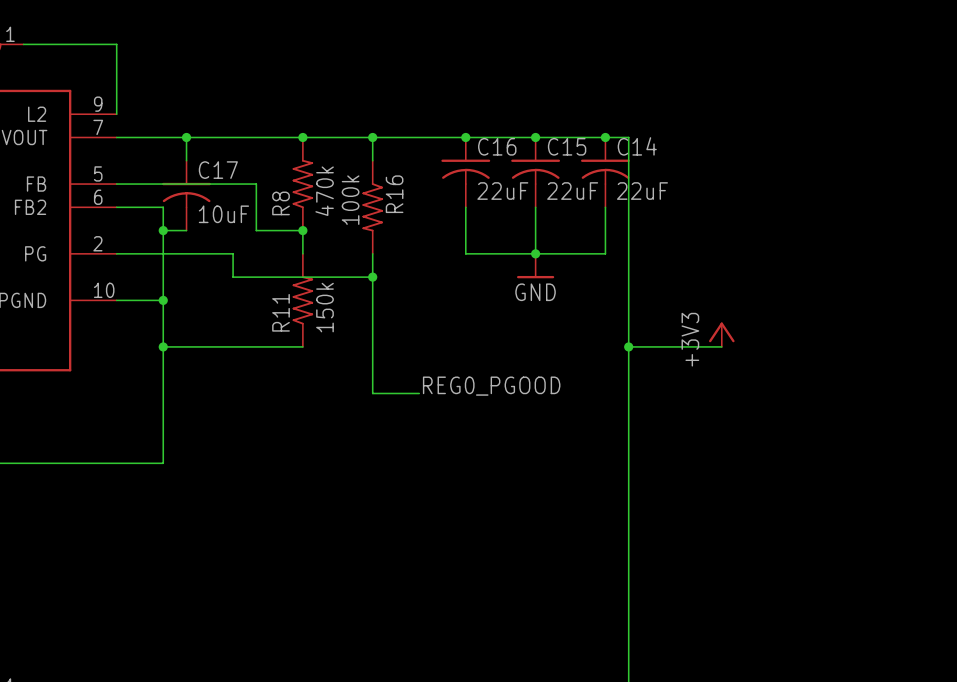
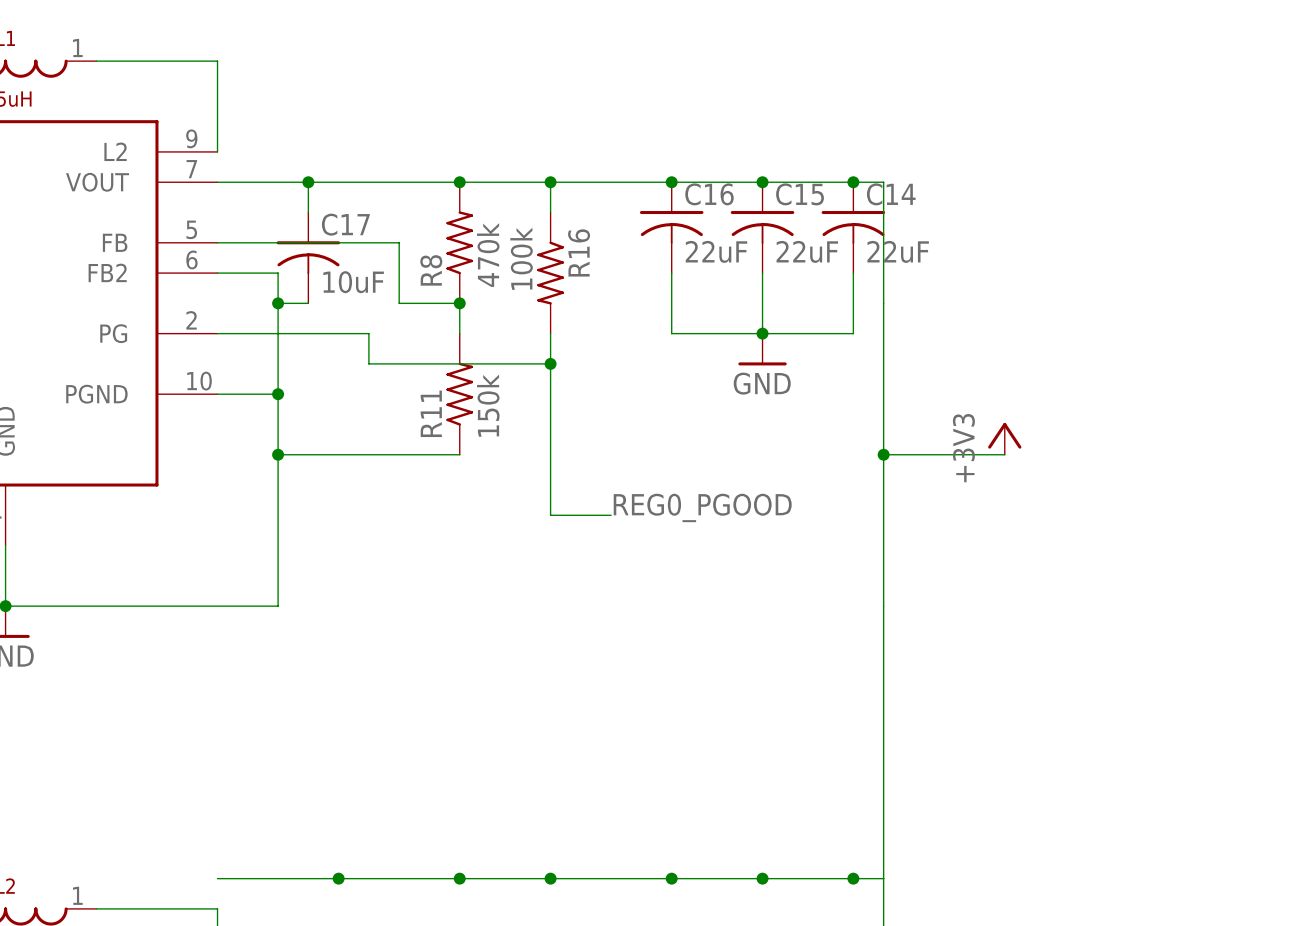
wire: none -> (217, 878) (883, 878)
junction: none -> (338, 878)
junction: none -> (459, 878)
junction: none -> (550, 878)
junction: none -> (671, 878)
junction: none -> (762, 878)
junction: none -> (853, 878)

